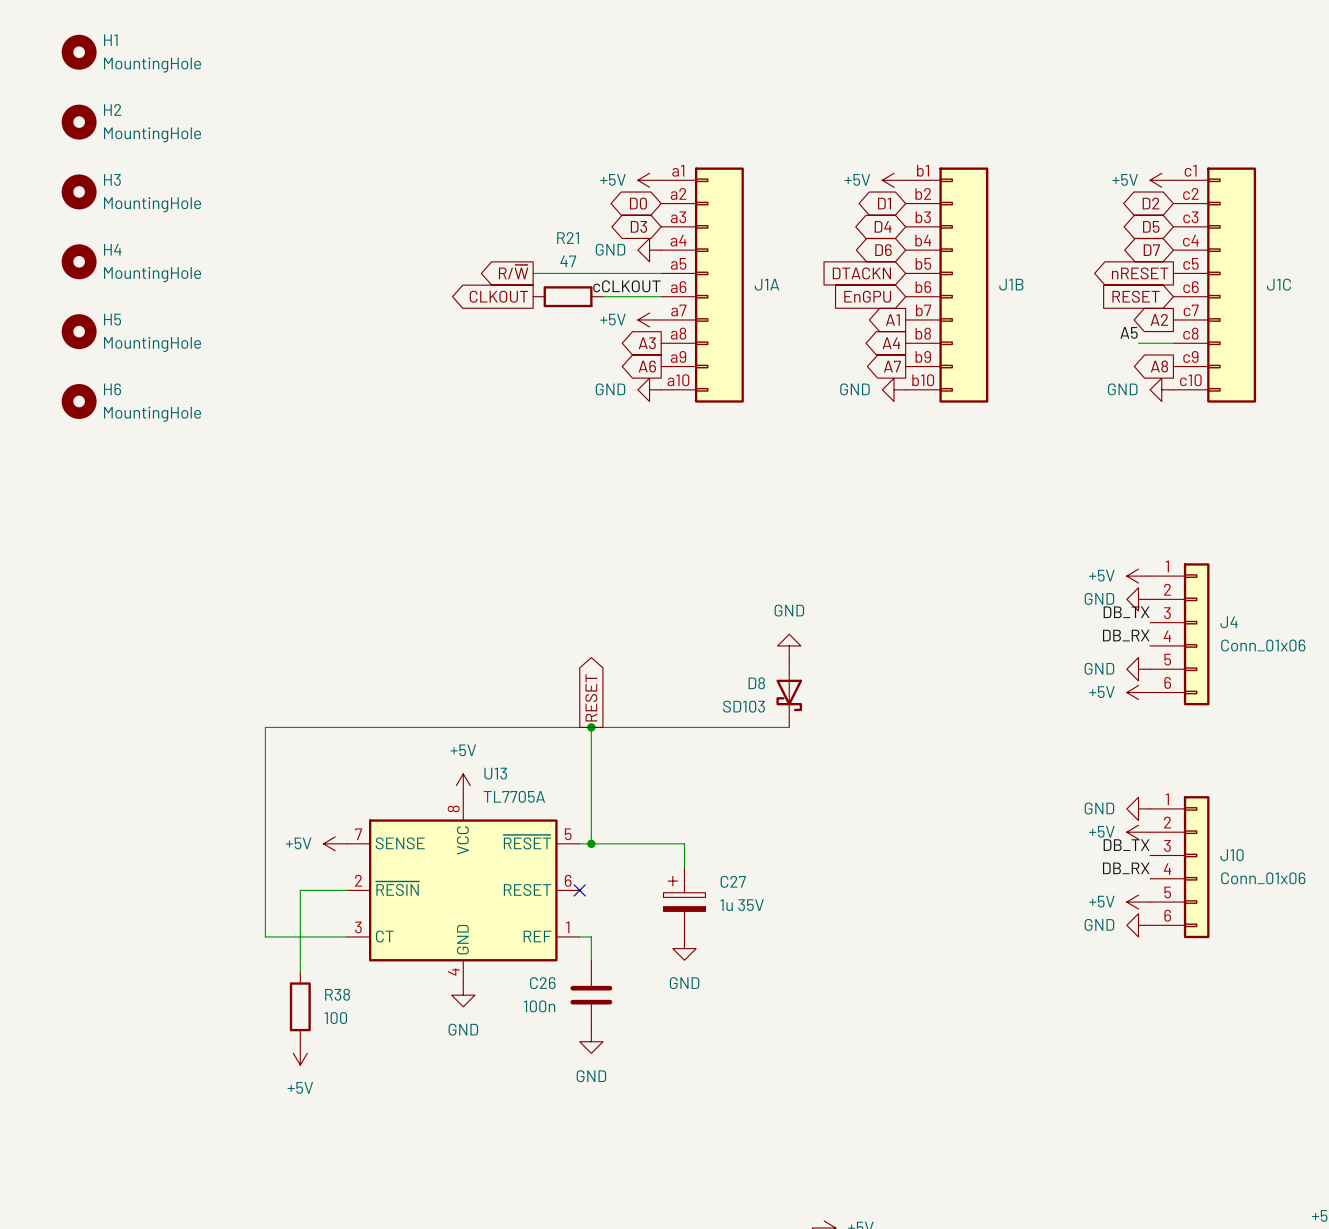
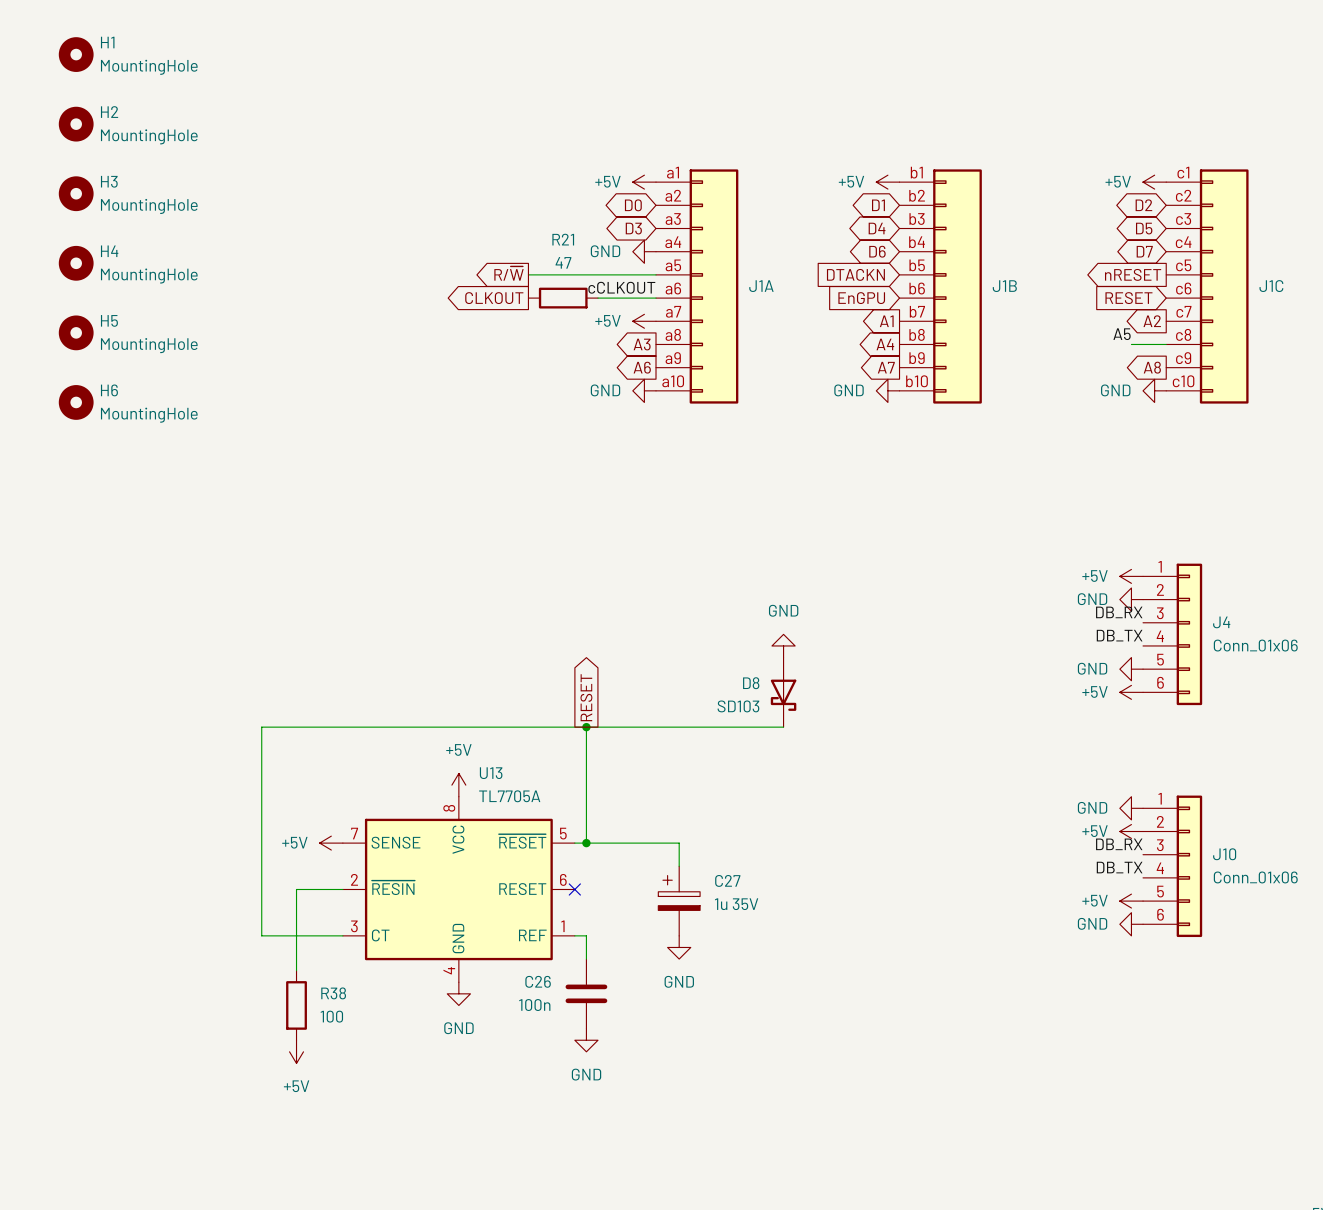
label: DB_TX (1126, 612) -> DB_RX (1119, 612)
label: DB_RX (1126, 635) -> DB_TX (1119, 635)
label: DB_TX (1126, 845) -> DB_RX (1119, 844)
label: DB_RX (1126, 868) -> DB_TX (1119, 867)

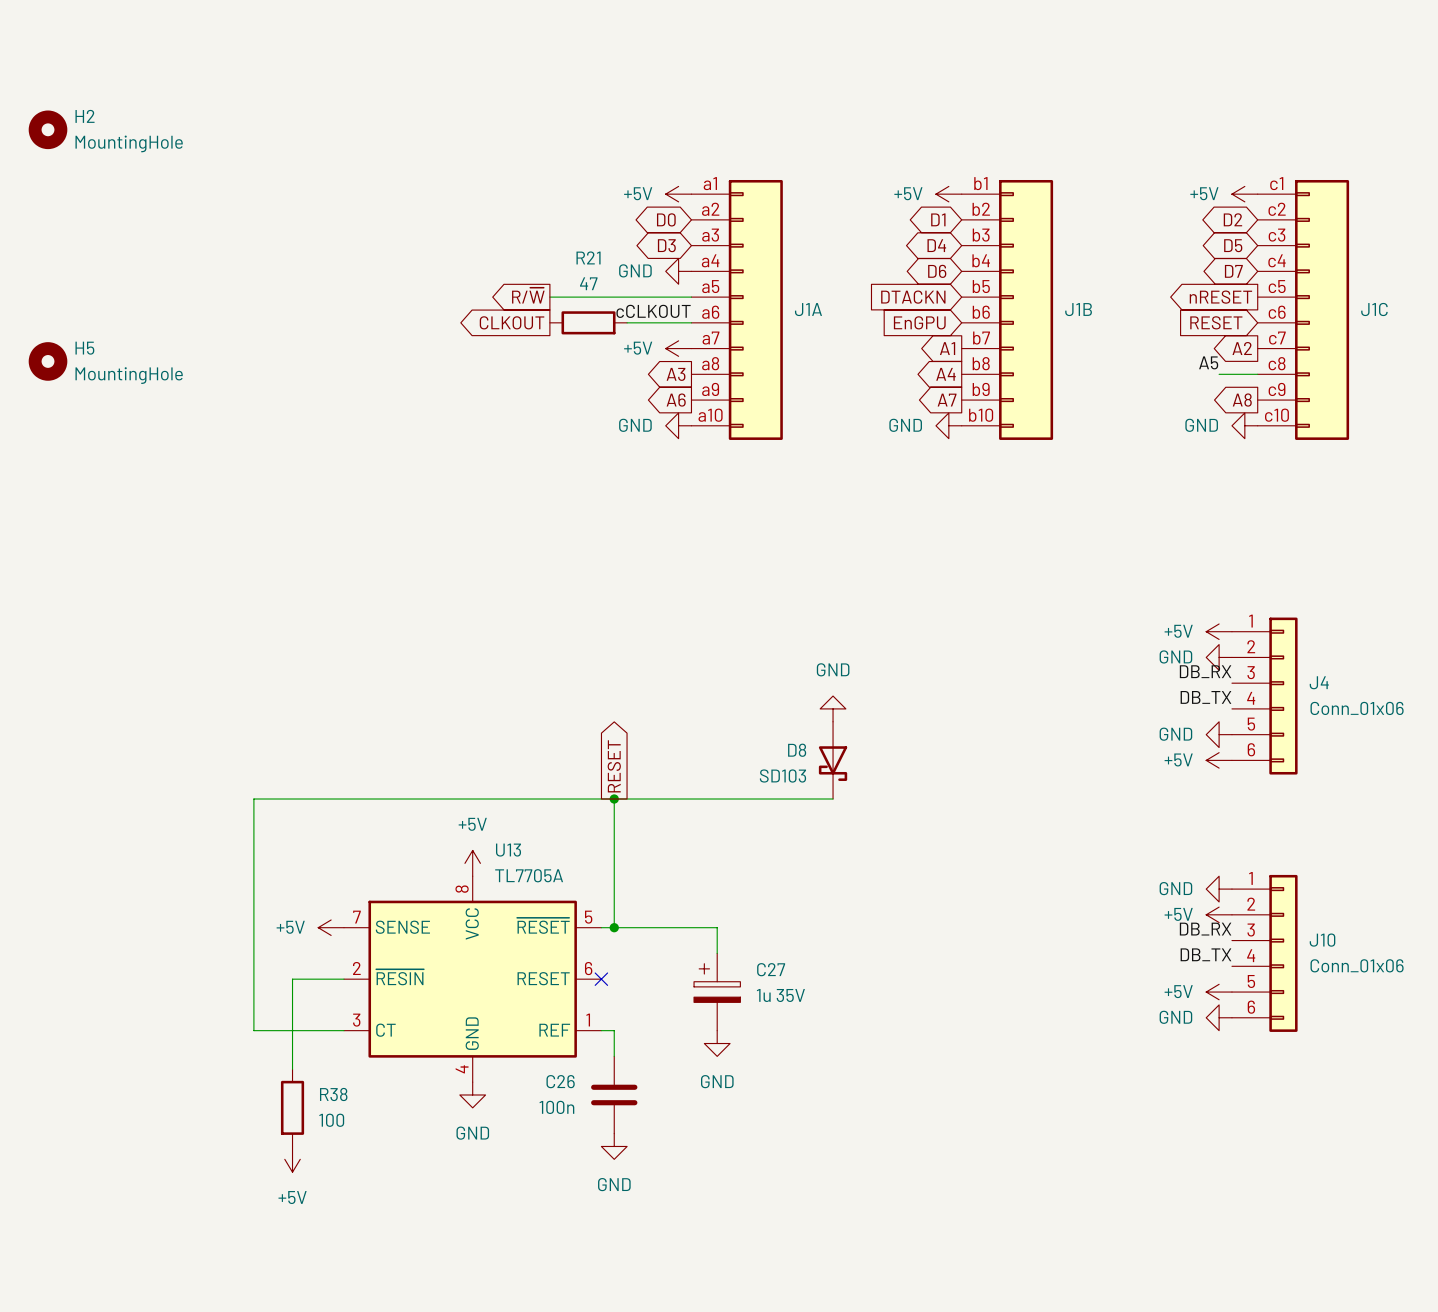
H1: MountingHole (76, 54) -> none
H3: MountingHole (76, 193) -> none
H4: MountingHole (76, 263) -> none
H6: MountingHole (76, 402) -> none

